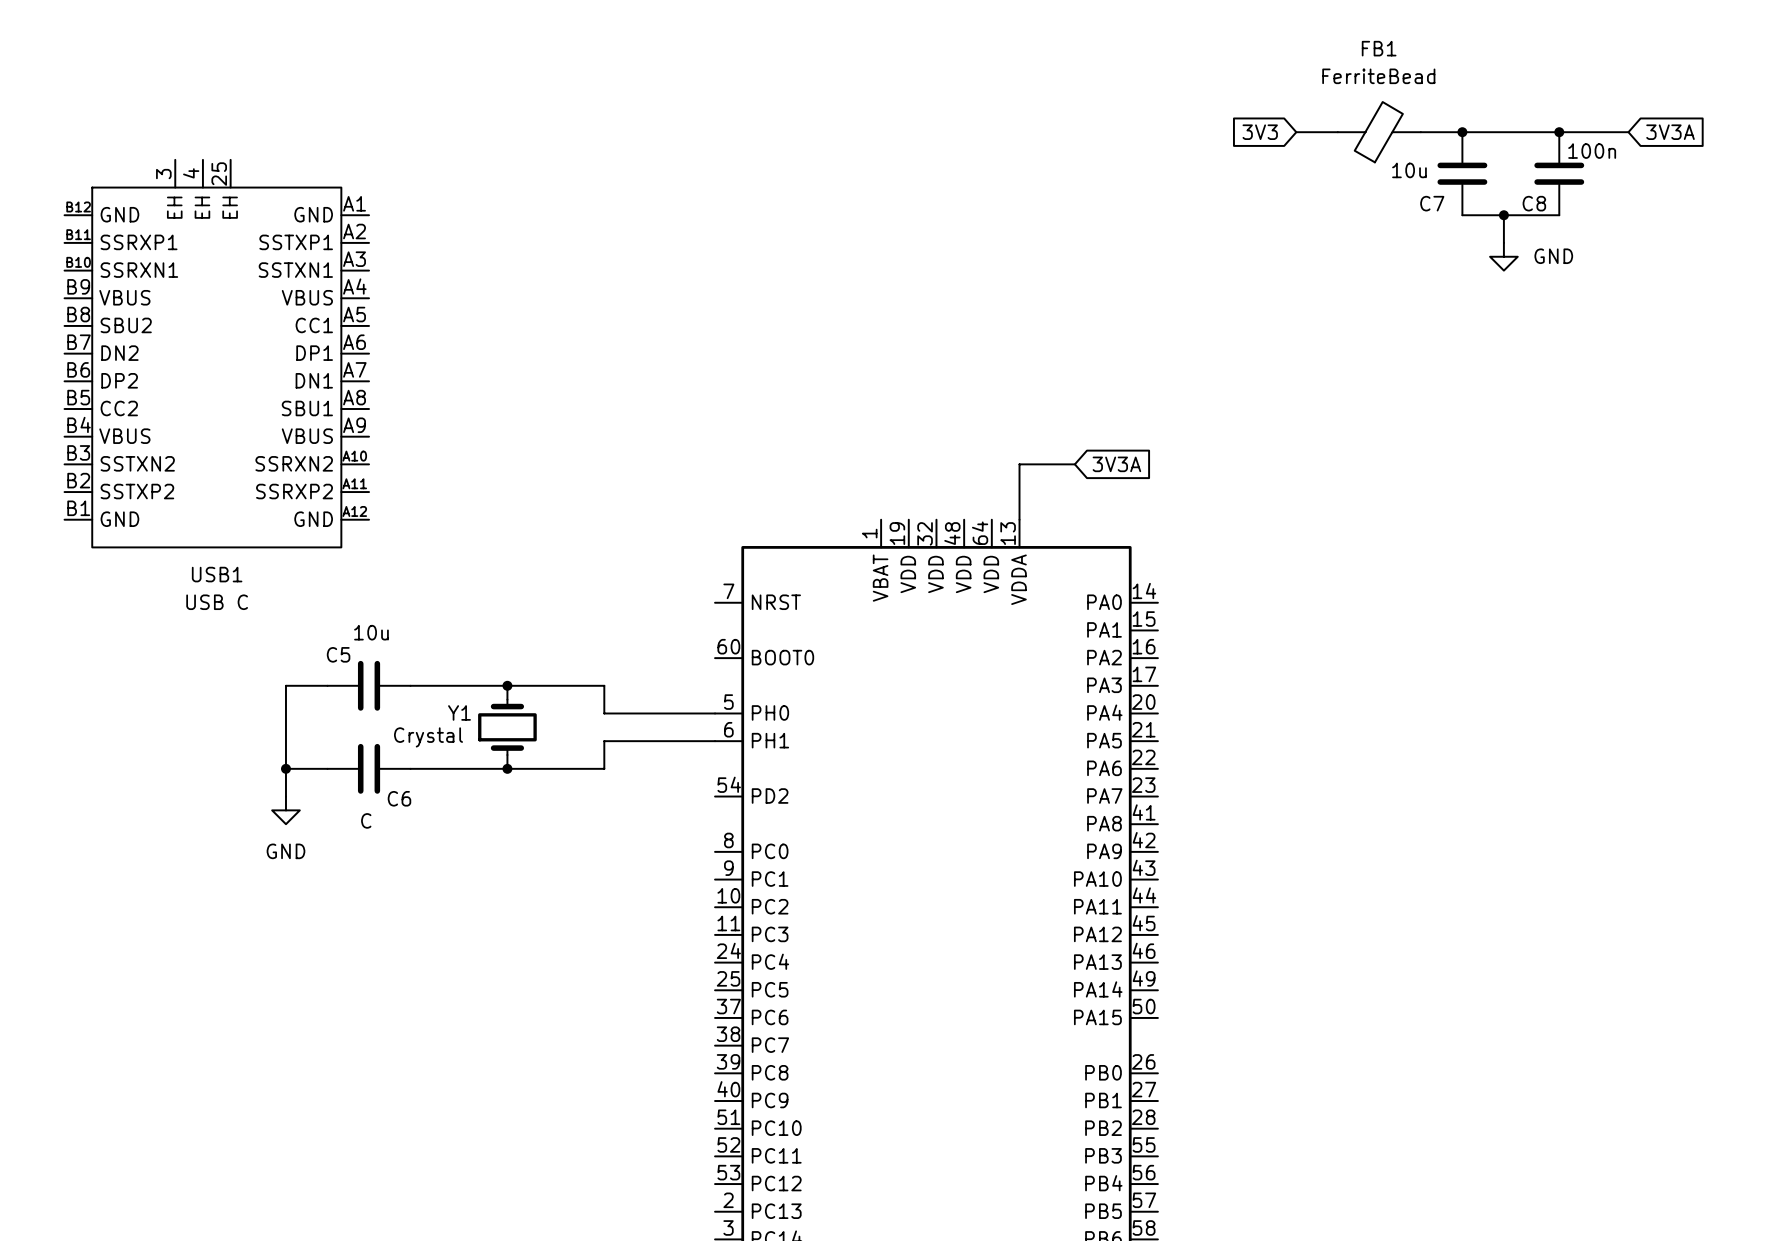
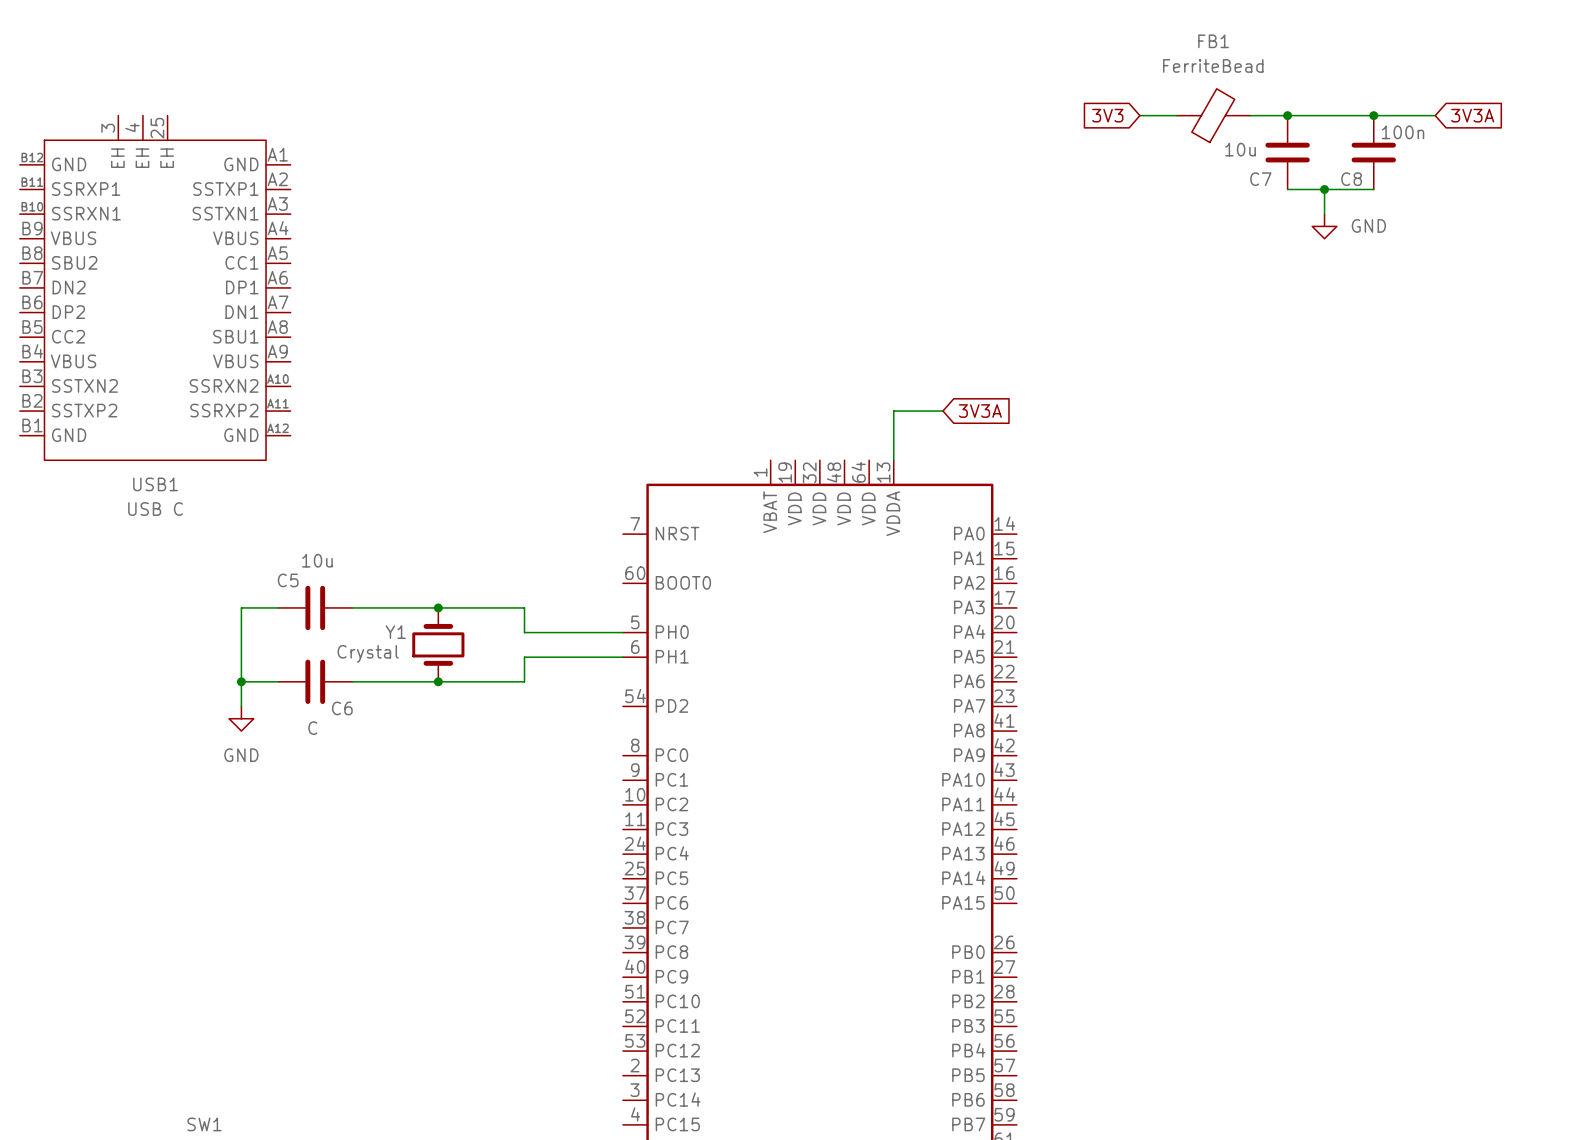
USB1 position: (216, 353) -> (155, 287)

